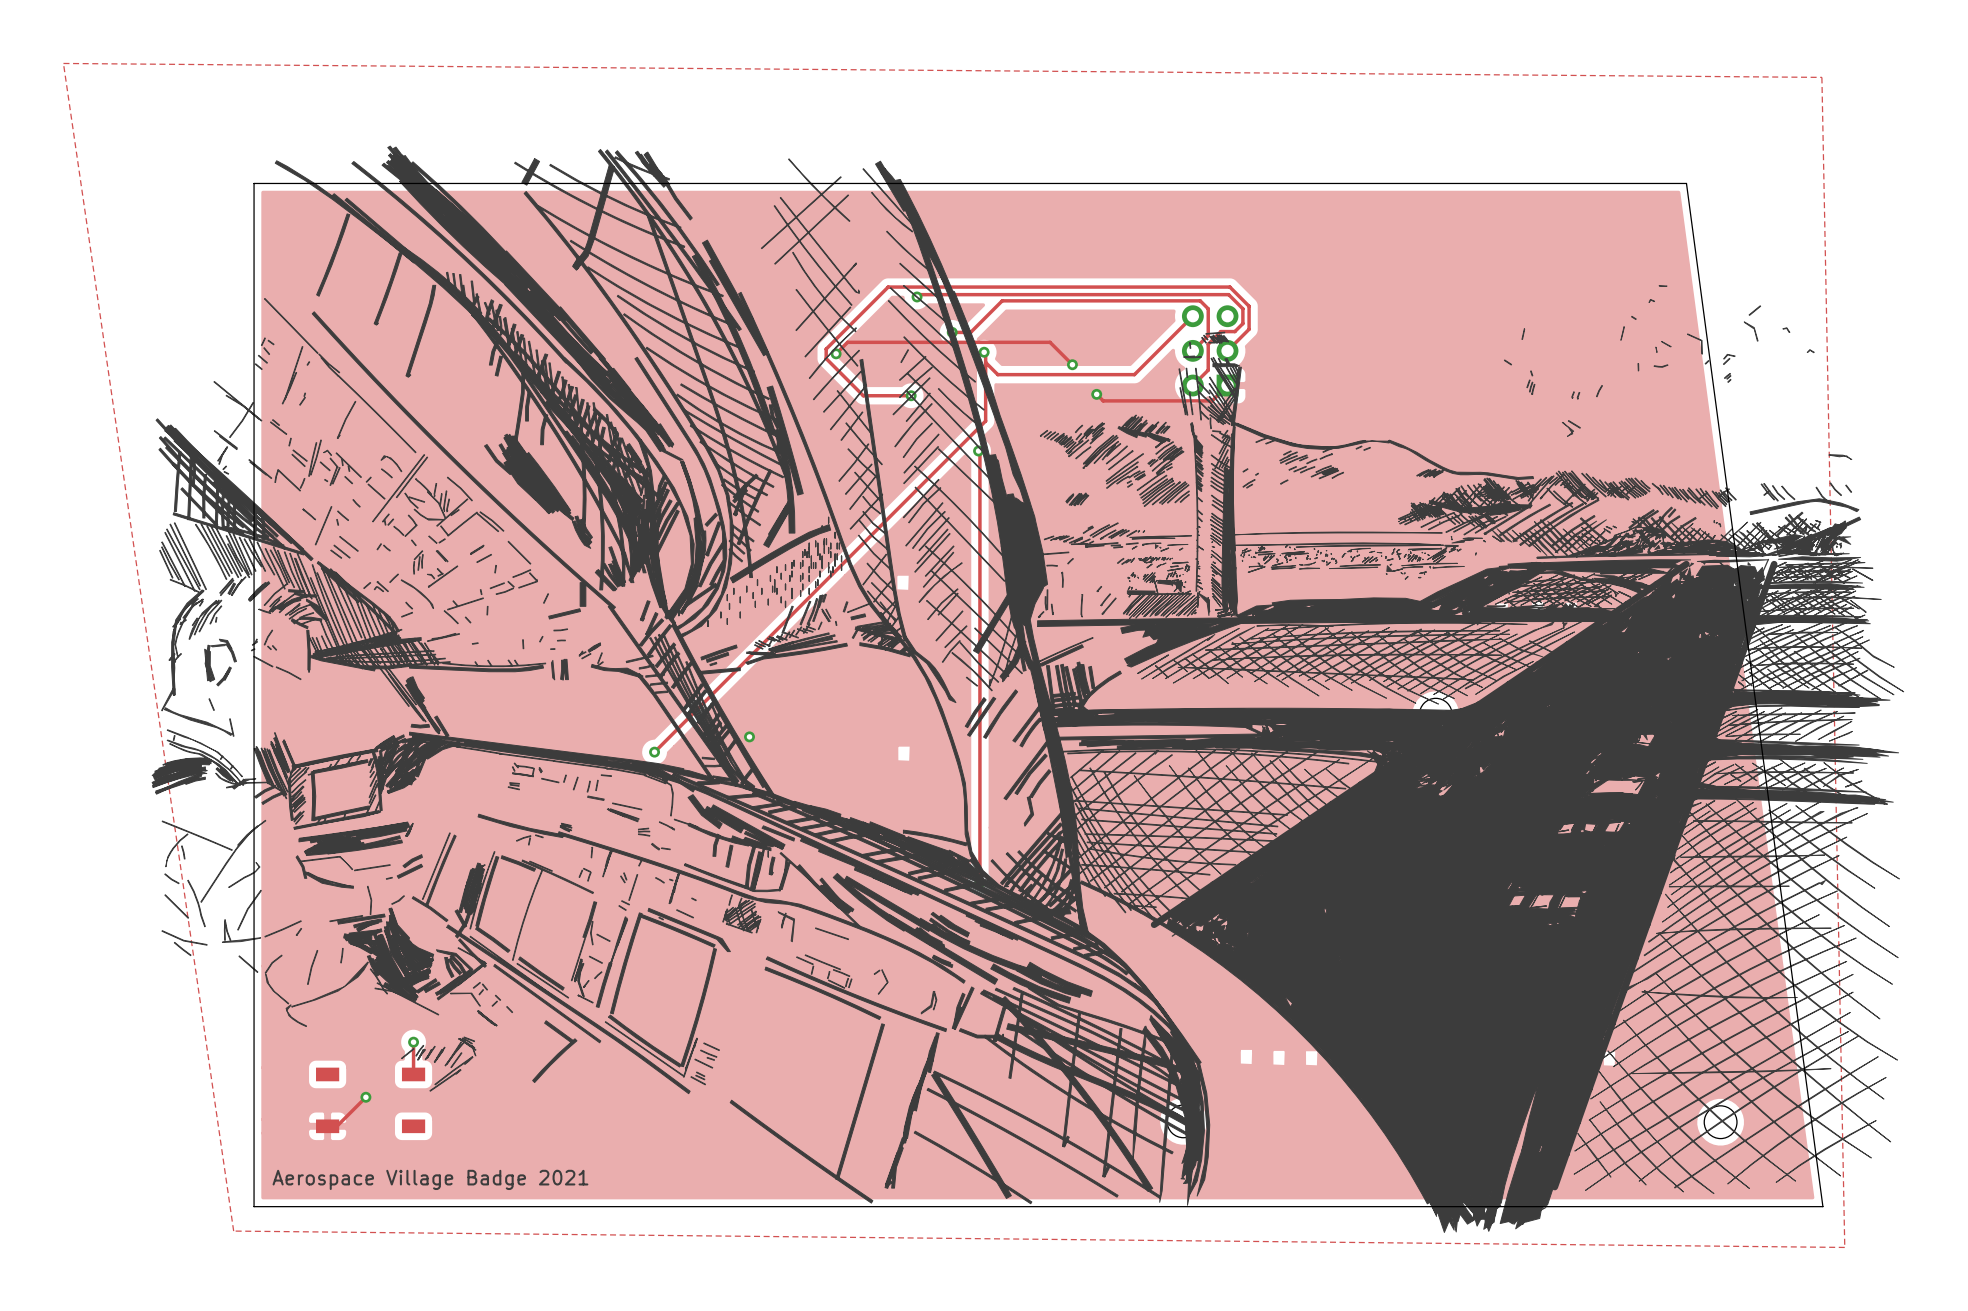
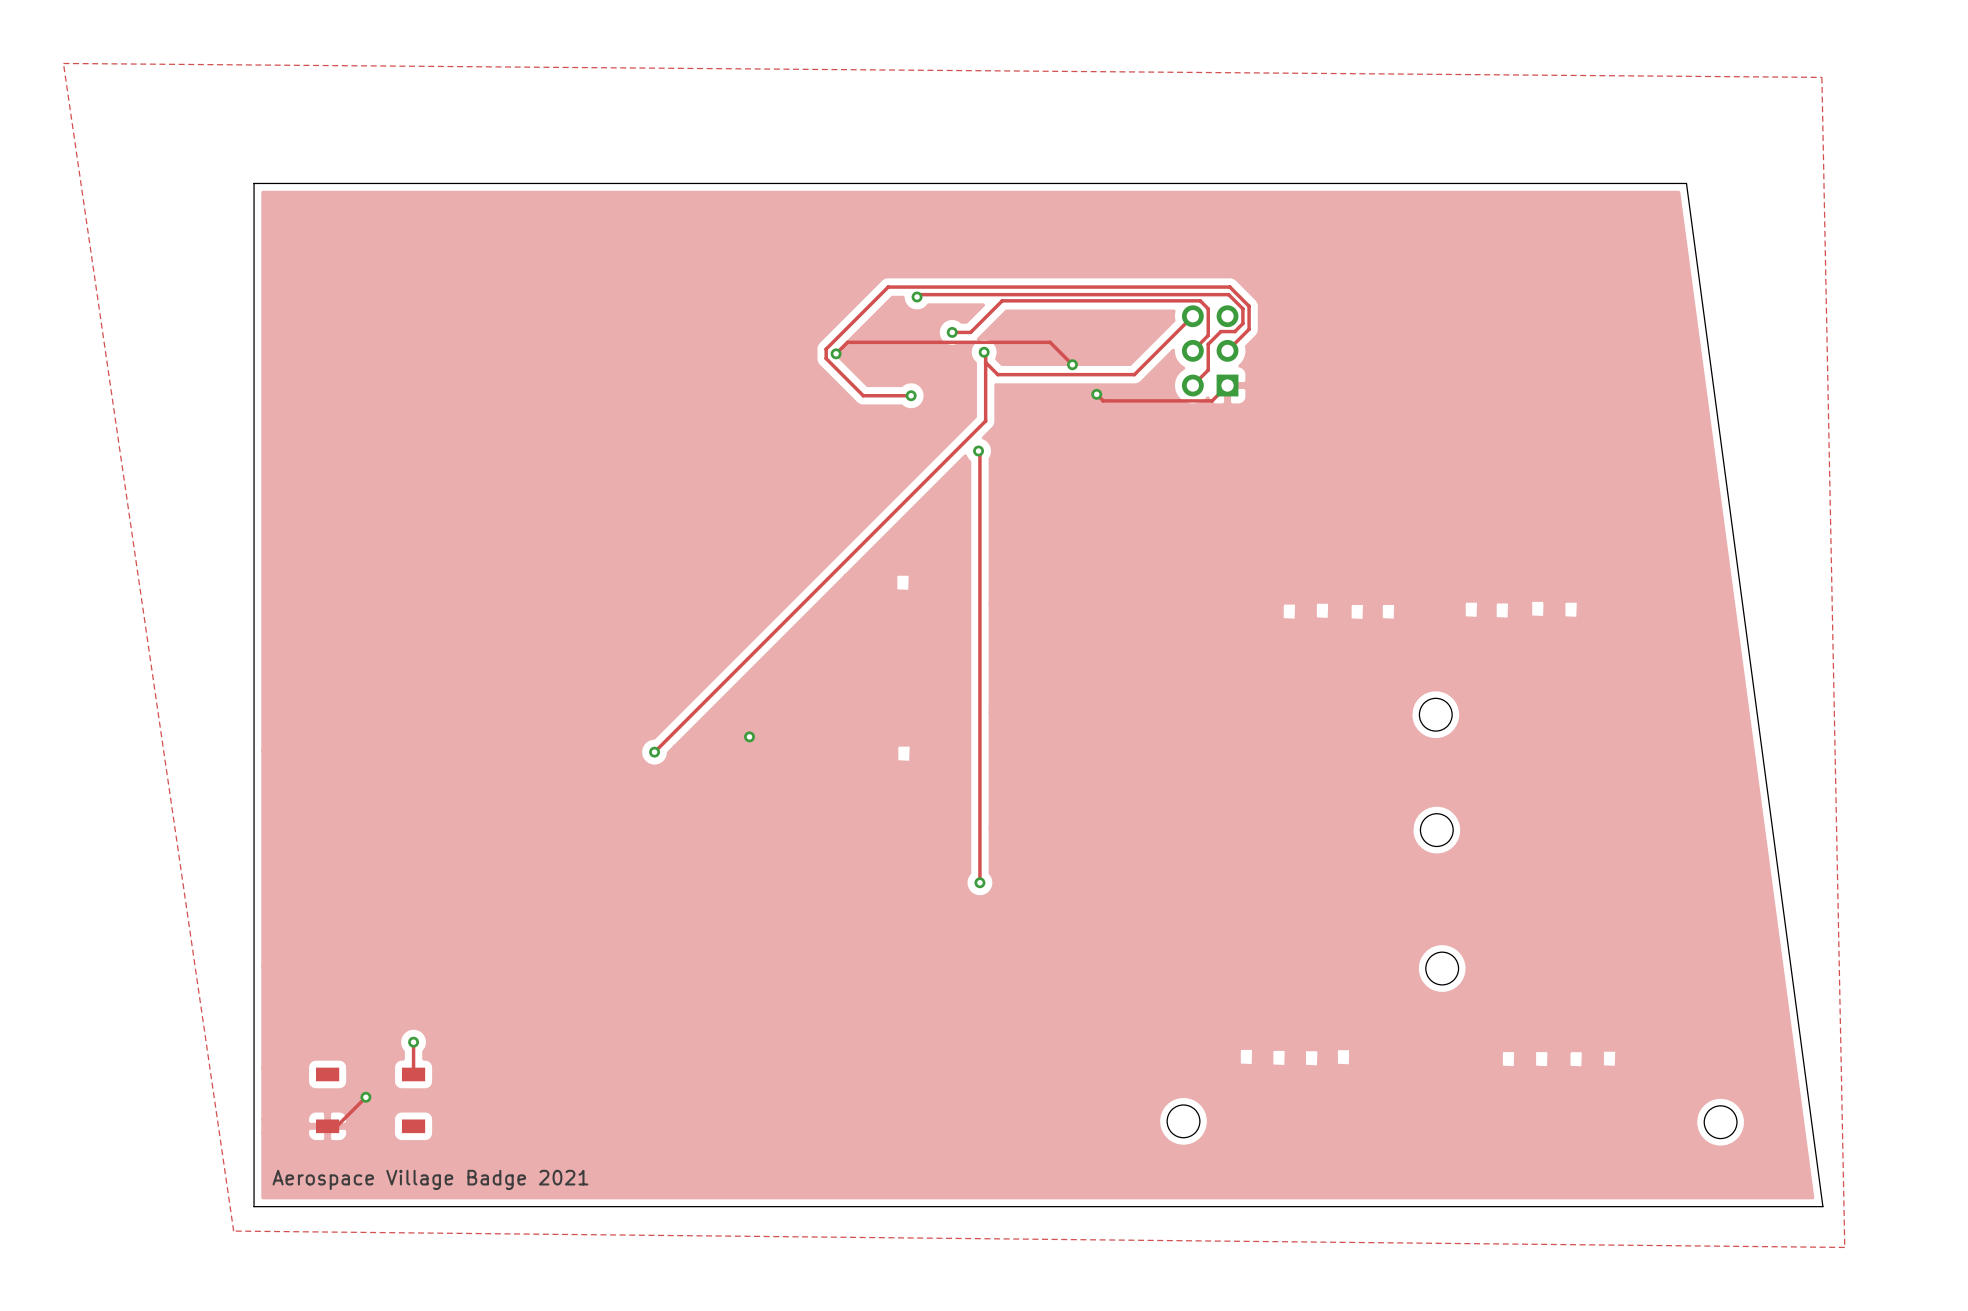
drawing: [151, 145, 1905, 1233] -> none

